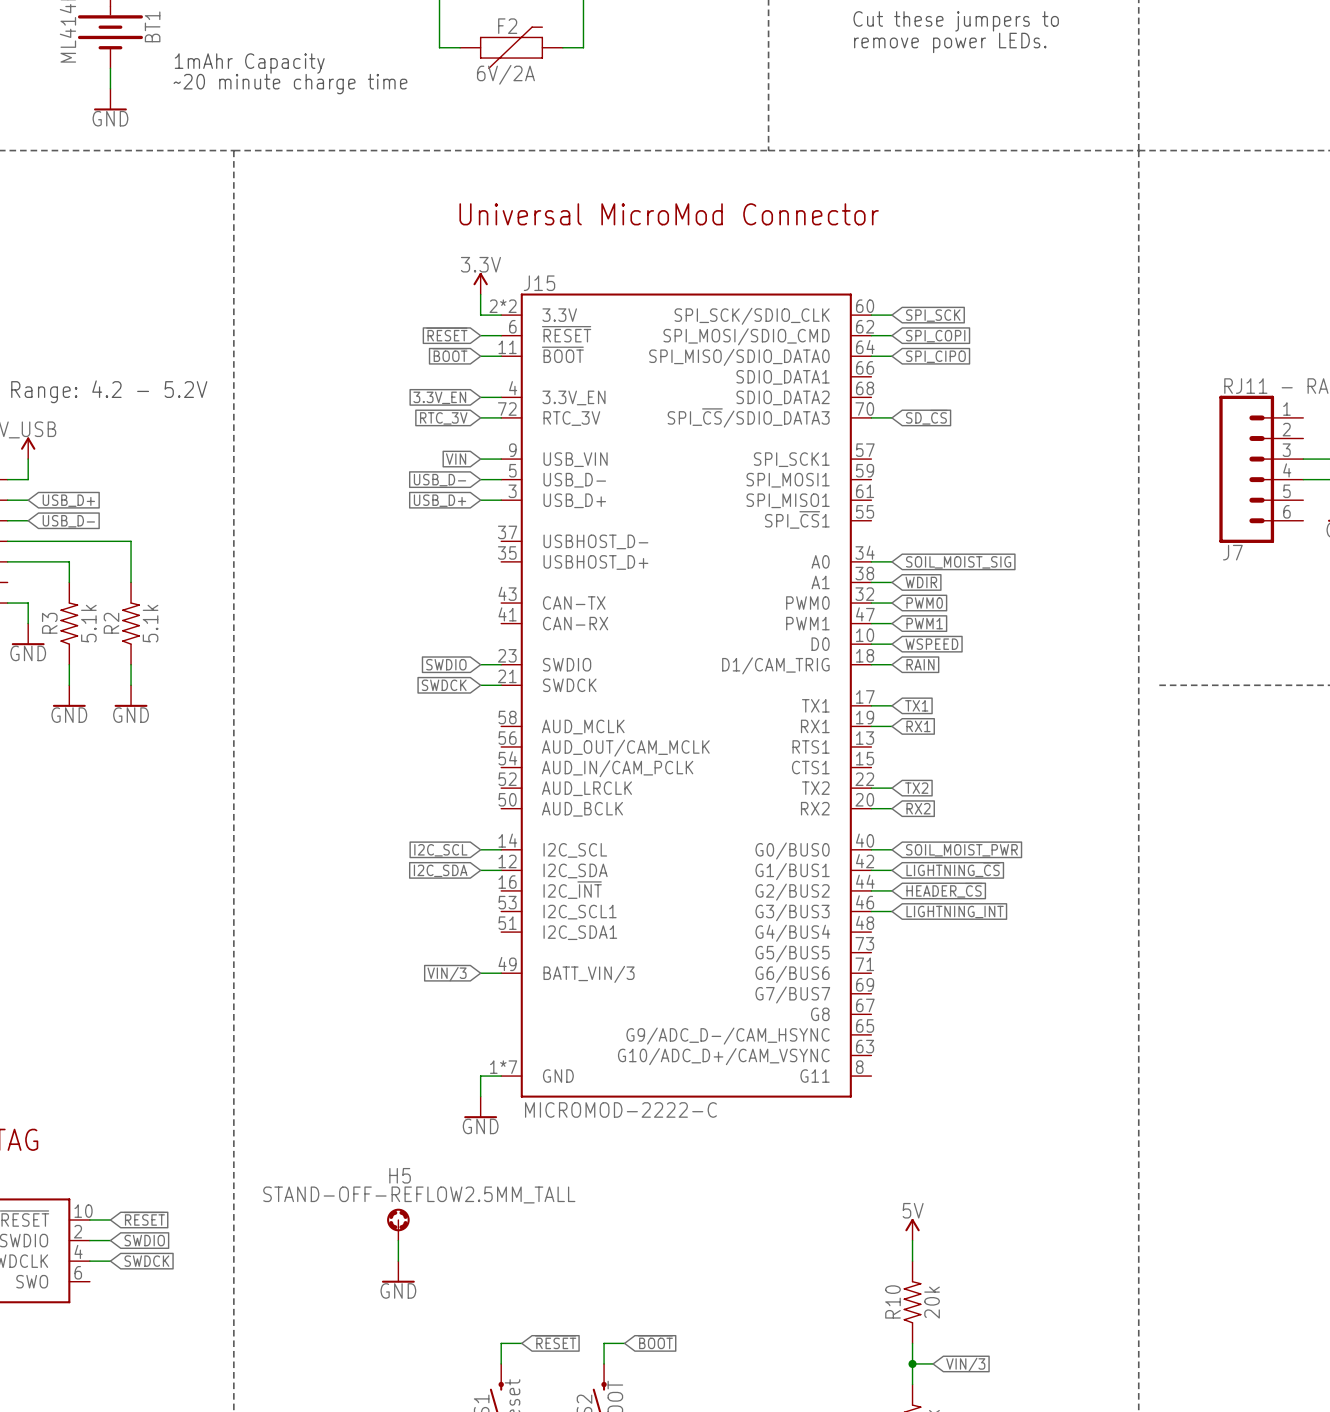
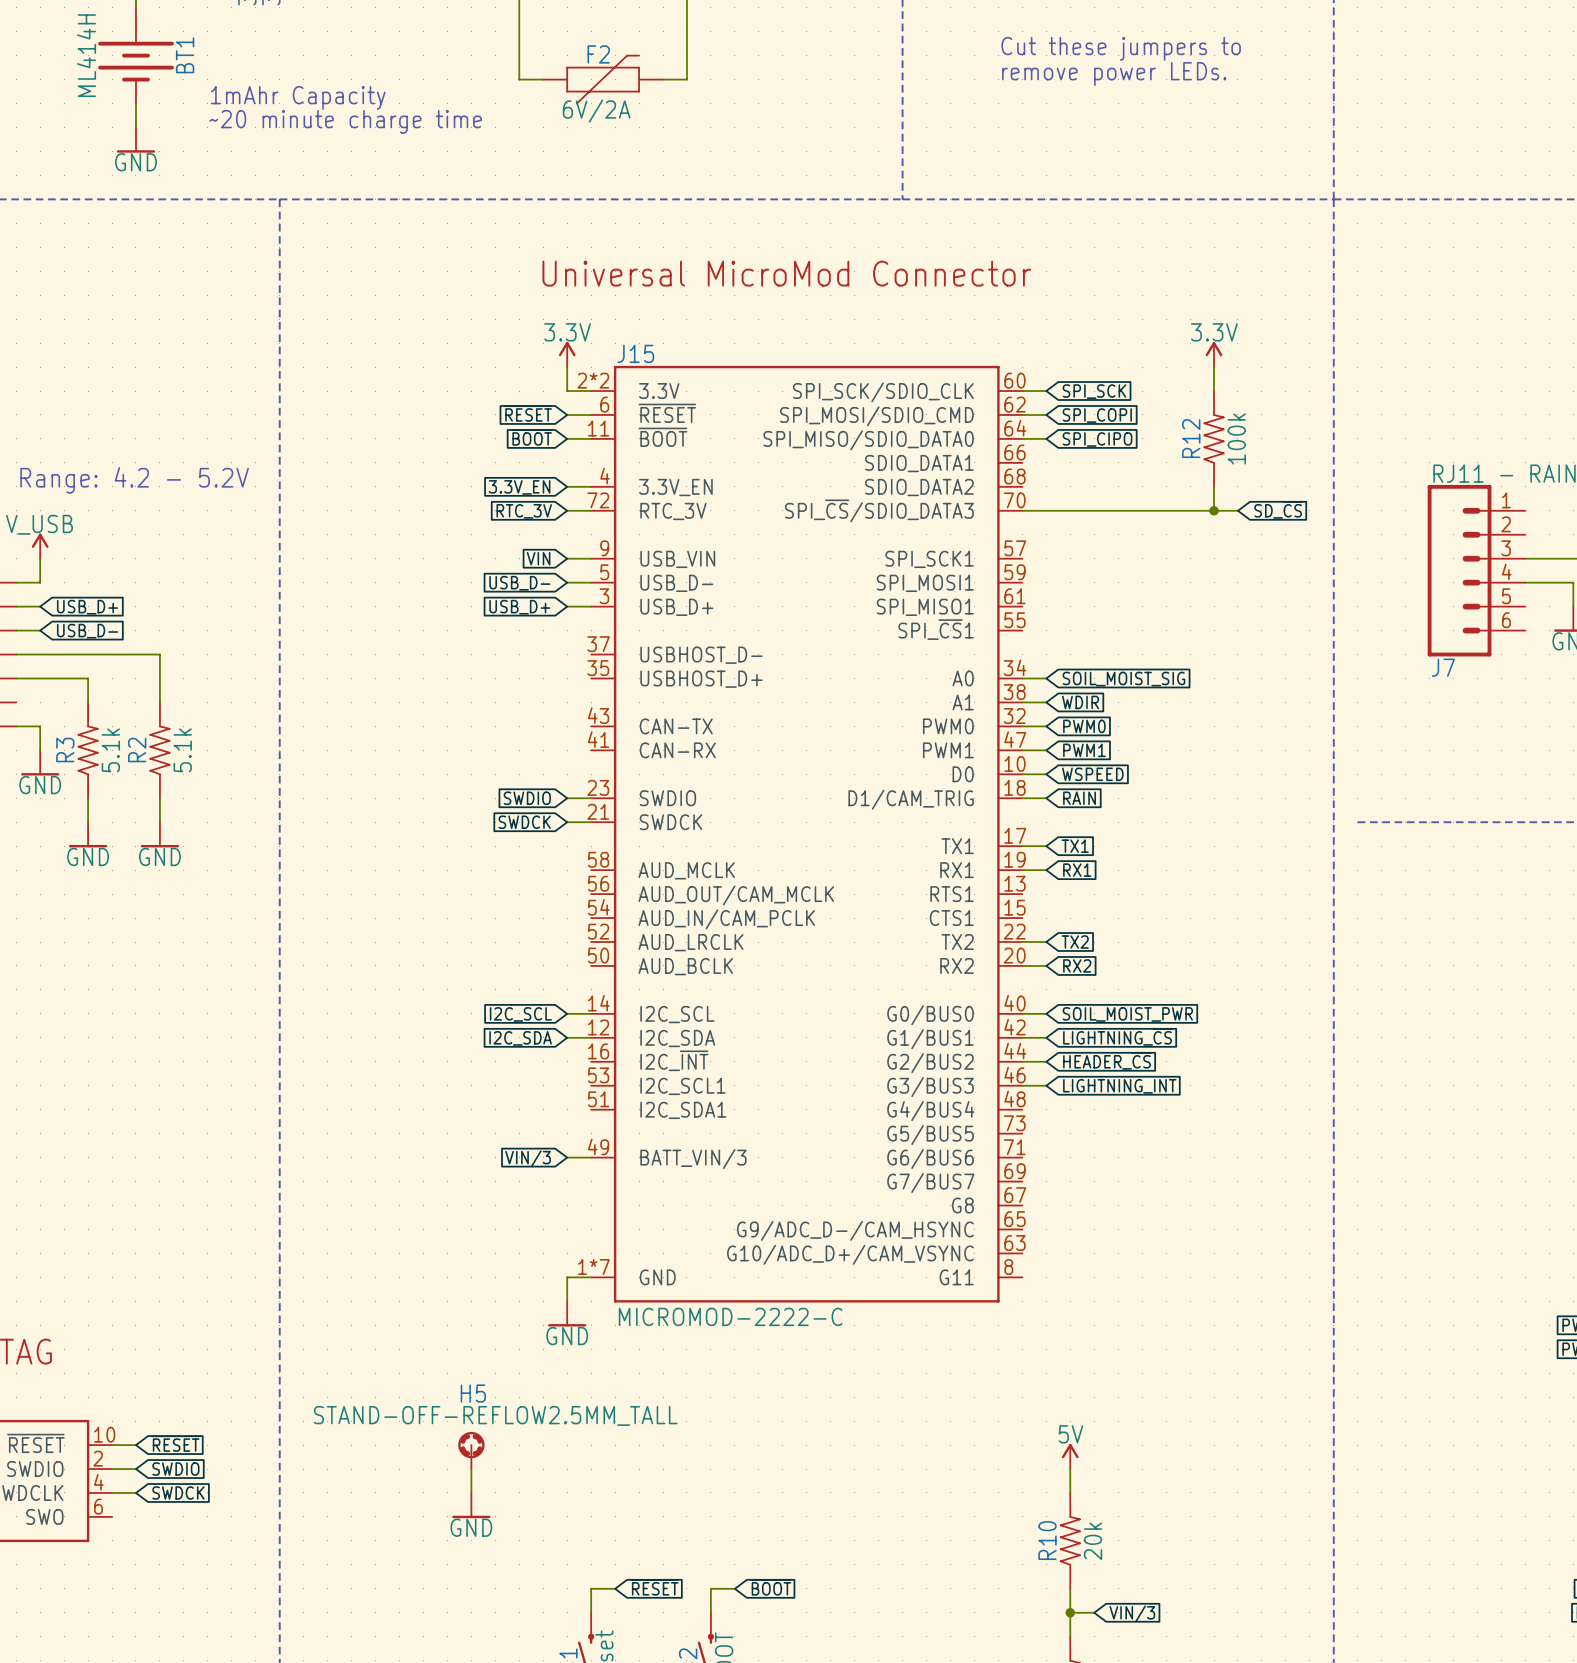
power symbol: none -> 3.3V (1214, 354)
wire: none -> (1214, 367) (1214, 391)
R12: none -> 100k (1214, 438)
wire: none -> (1214, 486) (1214, 510)
wire: none -> (1046, 510) (1237, 510)
global label position: SD_~{CS} (926, 417) -> SD_~{CS} (1278, 509)
junction: none -> (1214, 510)

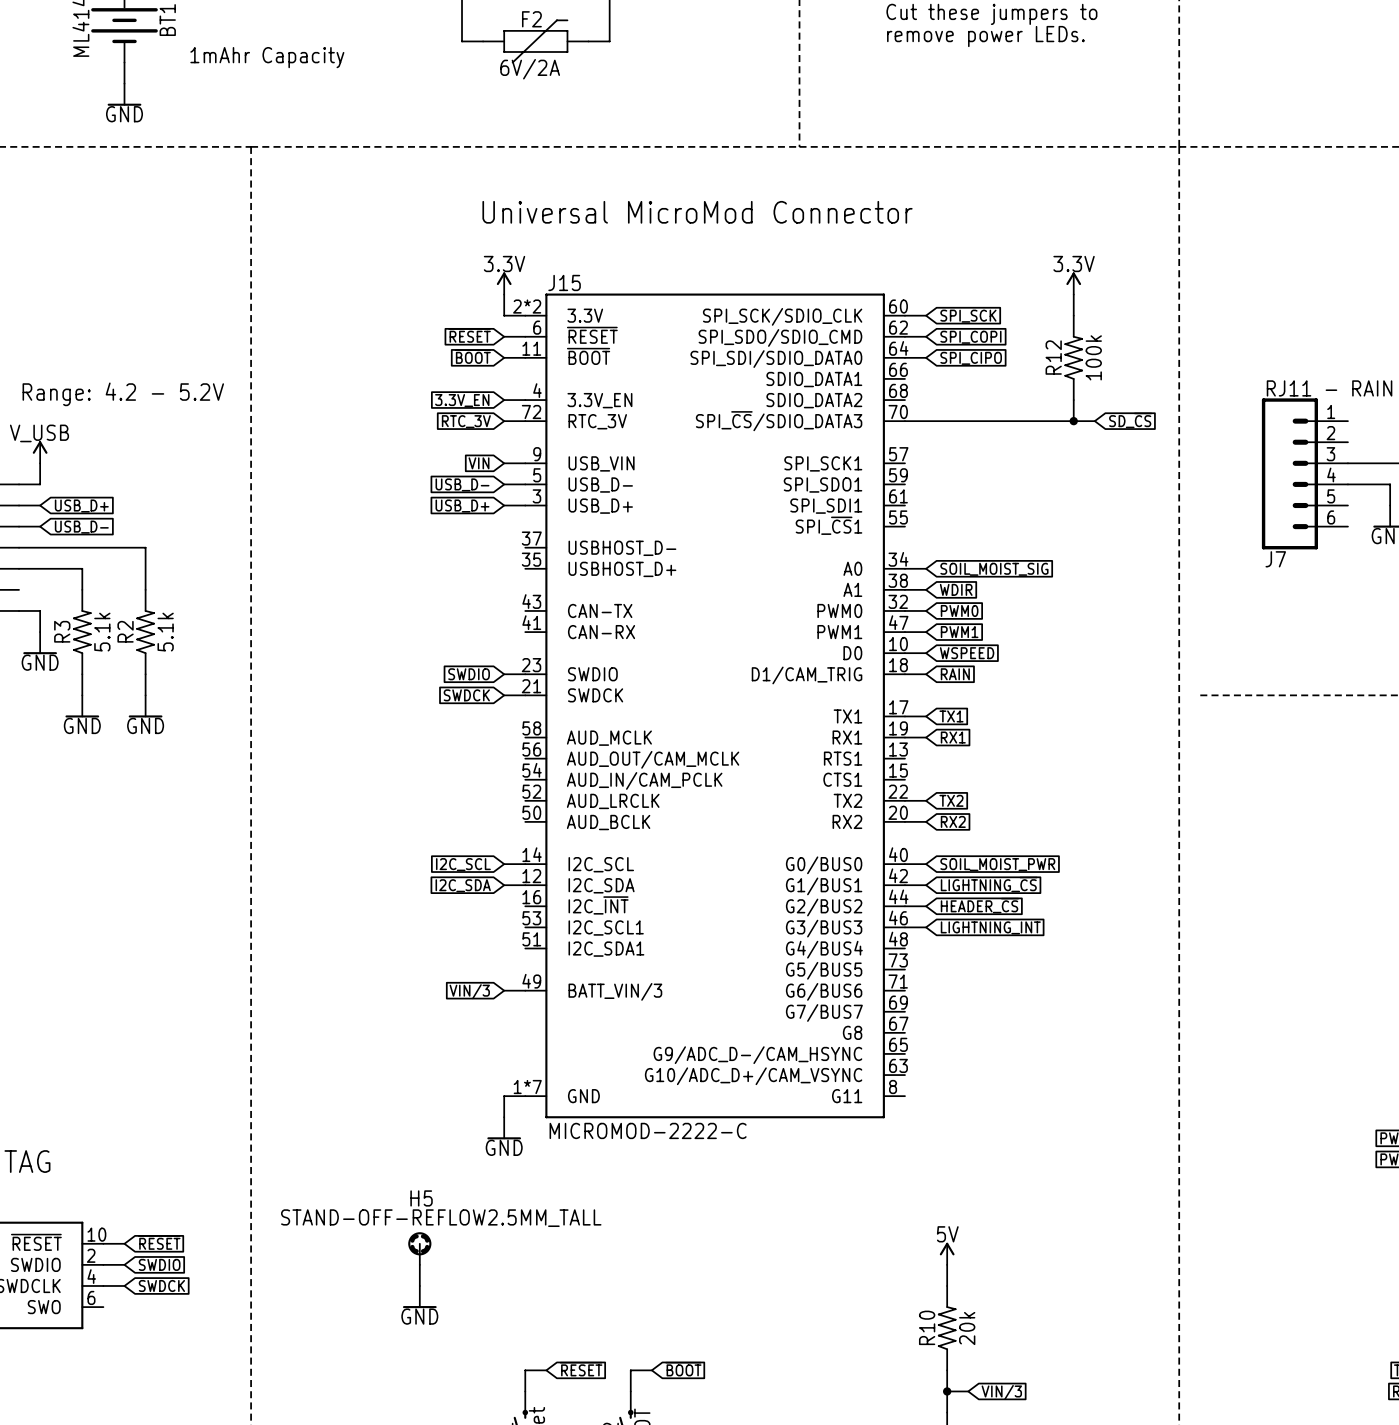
text: ~20 minute charge time (345, 121) -> none
J15 pin name: SPI_MOSI/SDIO_CMD (876, 416) -> SPI_SDO/SDIO_CMD (780, 337)
J15 pin name: SPI_MISO/SDIO_DATA0 (868, 440) -> SPI_SDI/SDIO_DATA0 (776, 359)
J15 pin name: SPI_MOSI1 (925, 583) -> SPI_SDO1 (823, 485)
J15 pin name: SPI_MISO1 (925, 607) -> SPI_SDI1 (826, 506)

